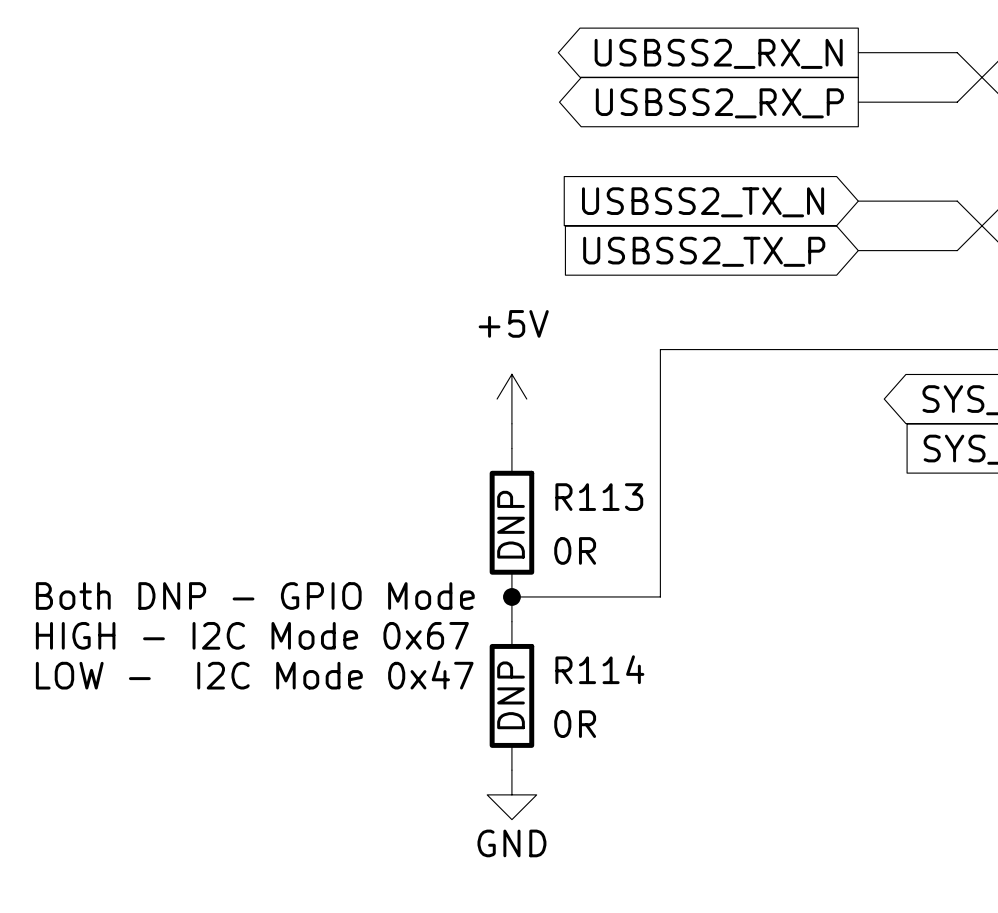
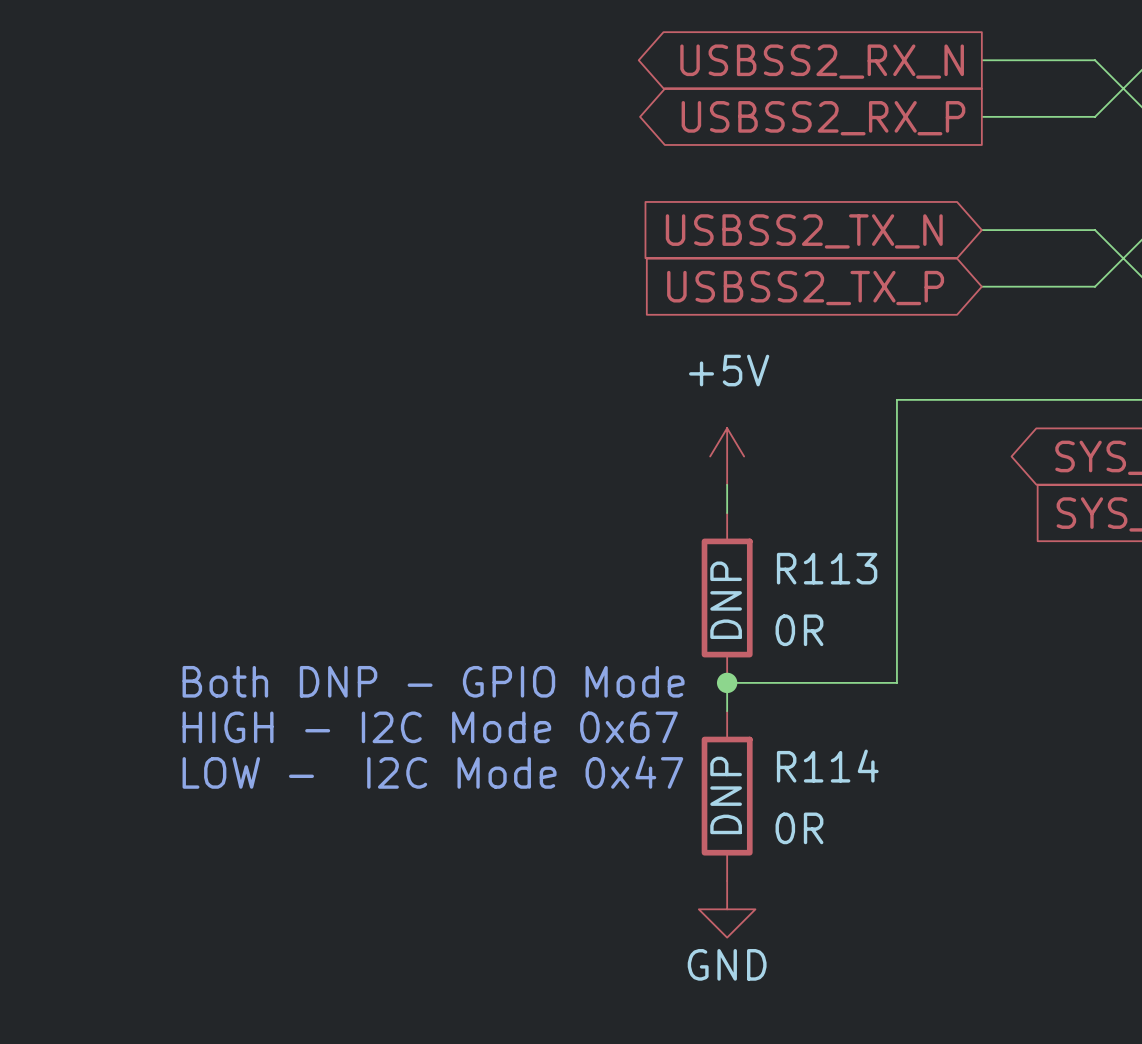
wire: (784, 349) (660, 349) (660, 596) -> (896, 399) (896, 682) (755, 682)
power symbol position: +5V (511, 399) -> +5V (727, 456)
wire: (511, 423) (511, 448) -> (727, 484) (727, 513)
R113 position: (511, 522) -> (727, 598)
text position: Both DNP - GPIO Mode (255, 596) -> Both DNP - GPIO Mode (433, 681)
junction: (511, 596) -> none
wire: (635, 596) (511, 596) (511, 621) -> (727, 682) (727, 711)
junction: none -> (727, 682)
text position: HIGH - I2C Mode 0x67 (252, 635) -> HIGH - I2C Mode 0x67 (430, 727)
text position: LOW - I2C Mode 0x47 (254, 675) -> LOW - I2C Mode 0x47 (432, 772)
R114 position: (511, 695) -> (727, 796)
power symbol position: GND (511, 794) -> GND (727, 909)

